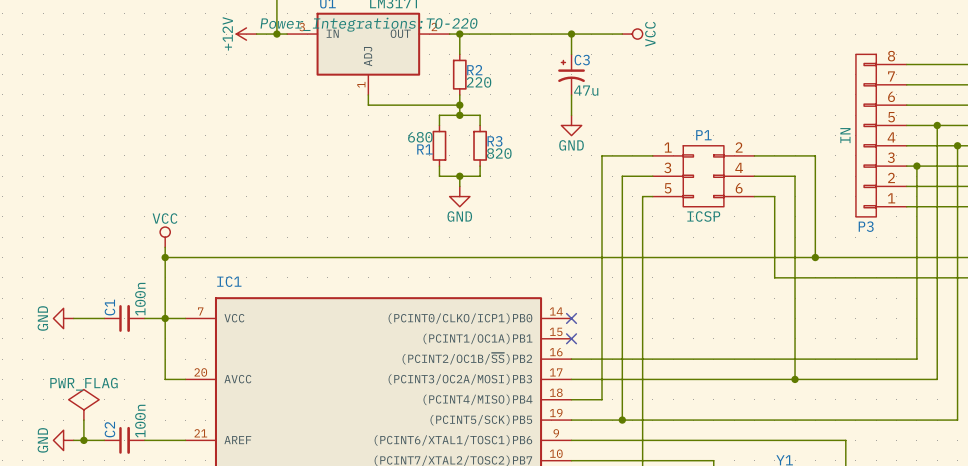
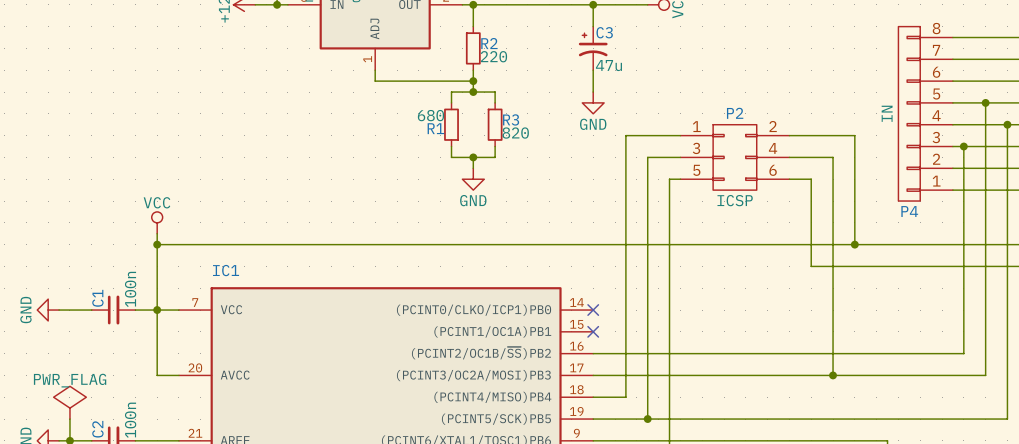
P1 name: P1 (703, 135) -> P2 (735, 113)
P3 name: P3 (866, 226) -> P4 (909, 211)

